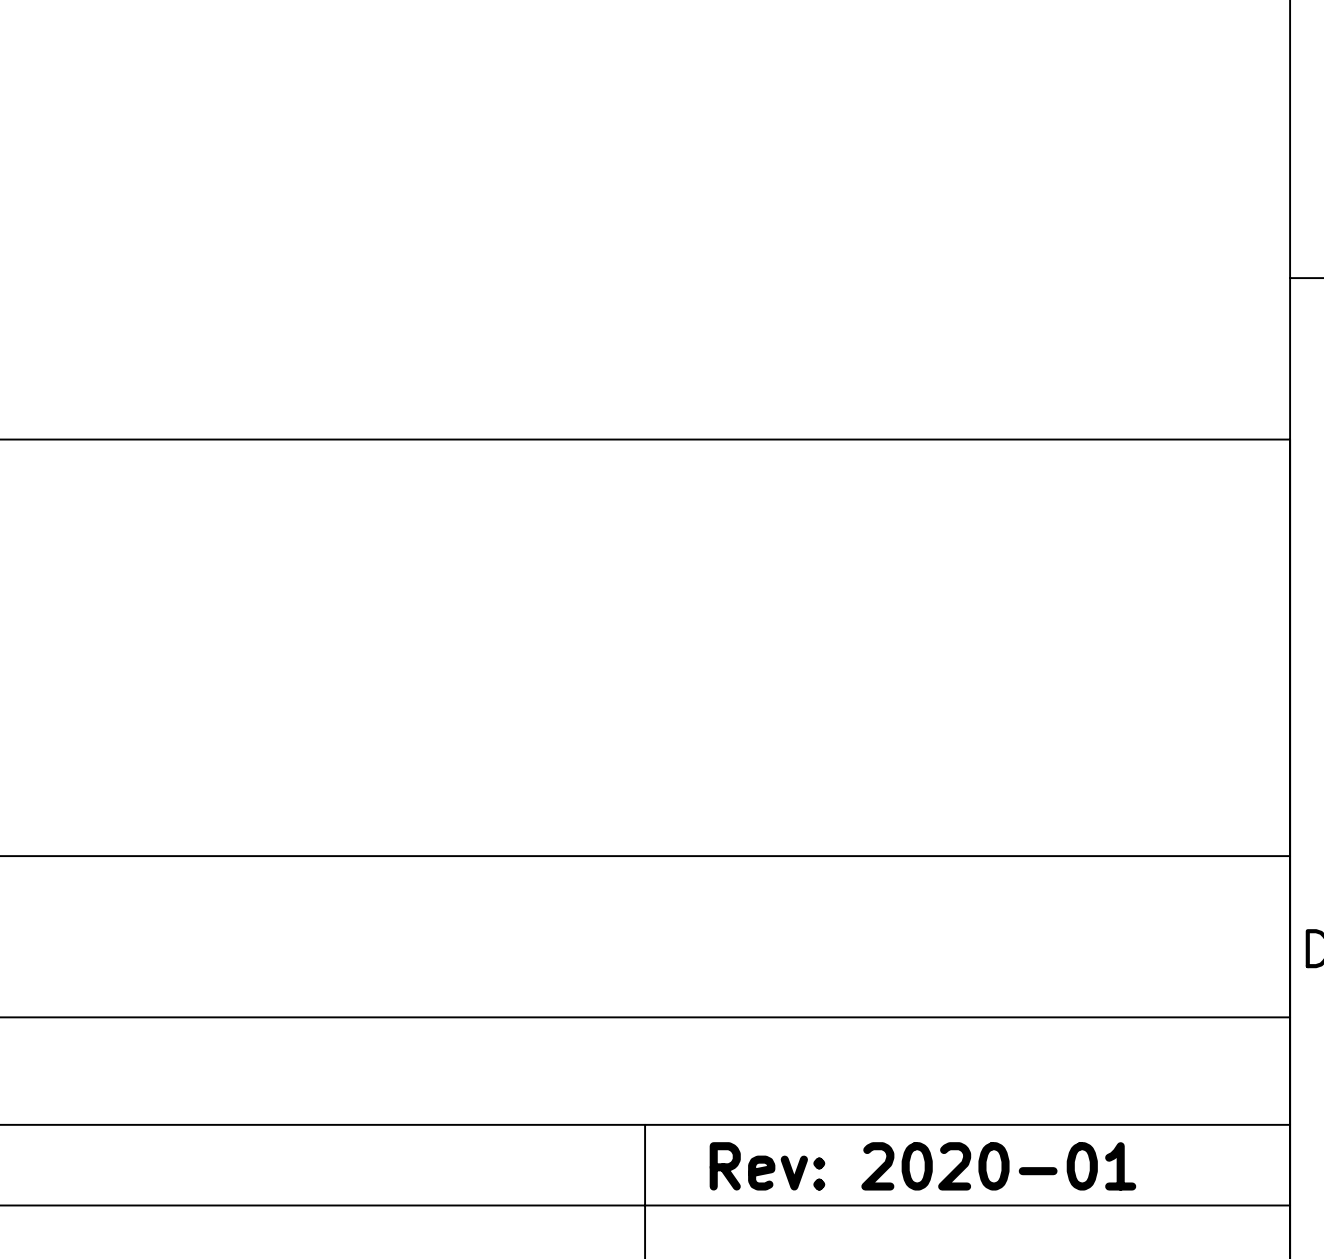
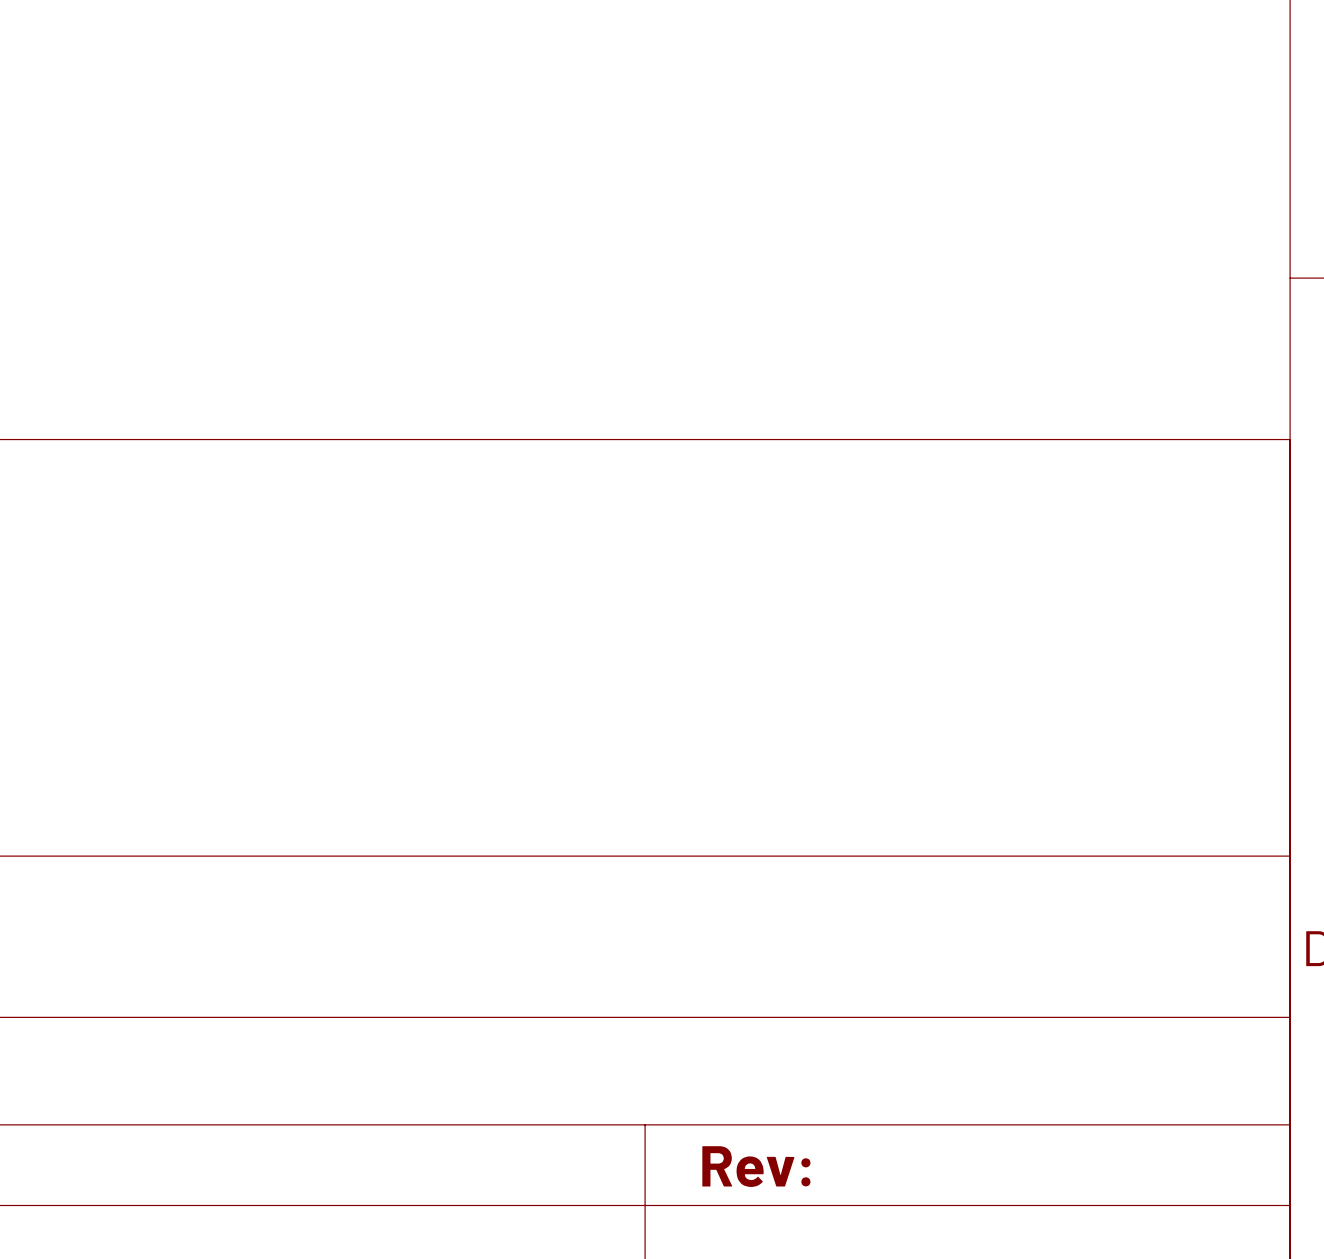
title block: Rev: 2020-01 (922, 1166) -> Rev: (756, 1166)

